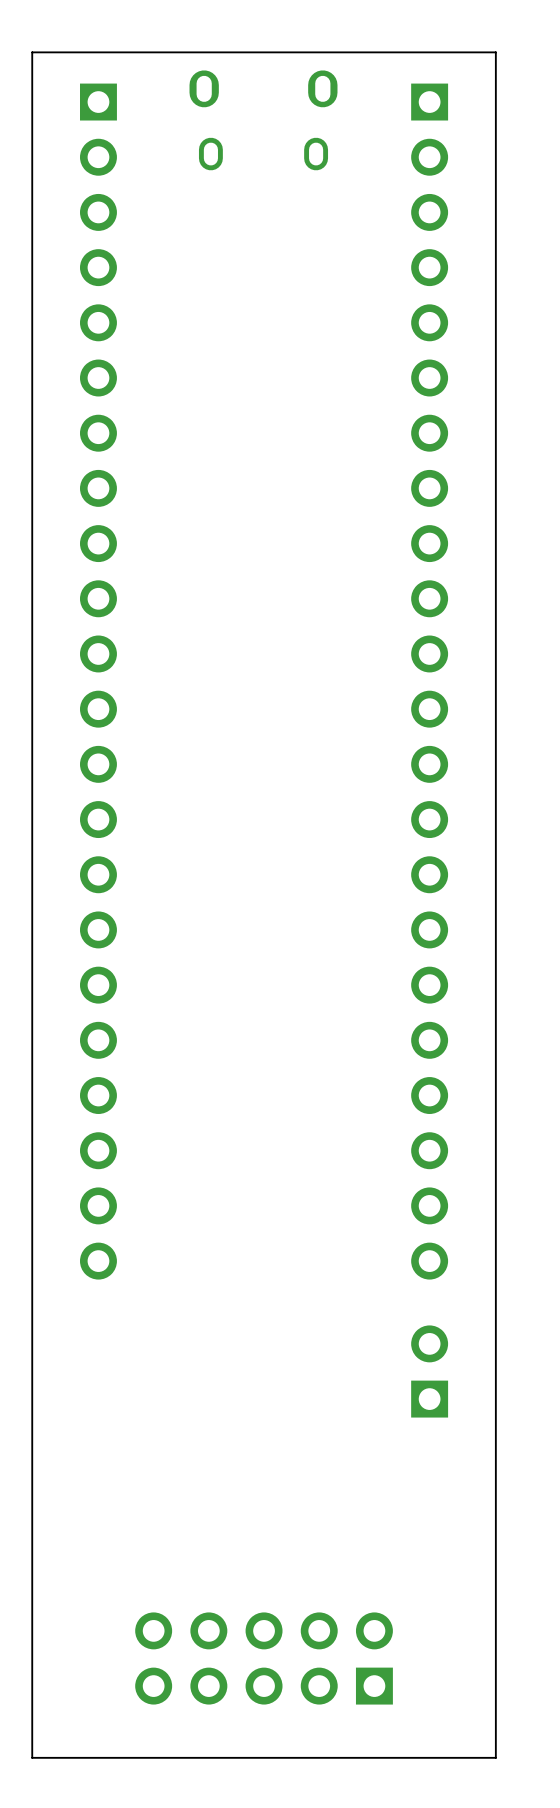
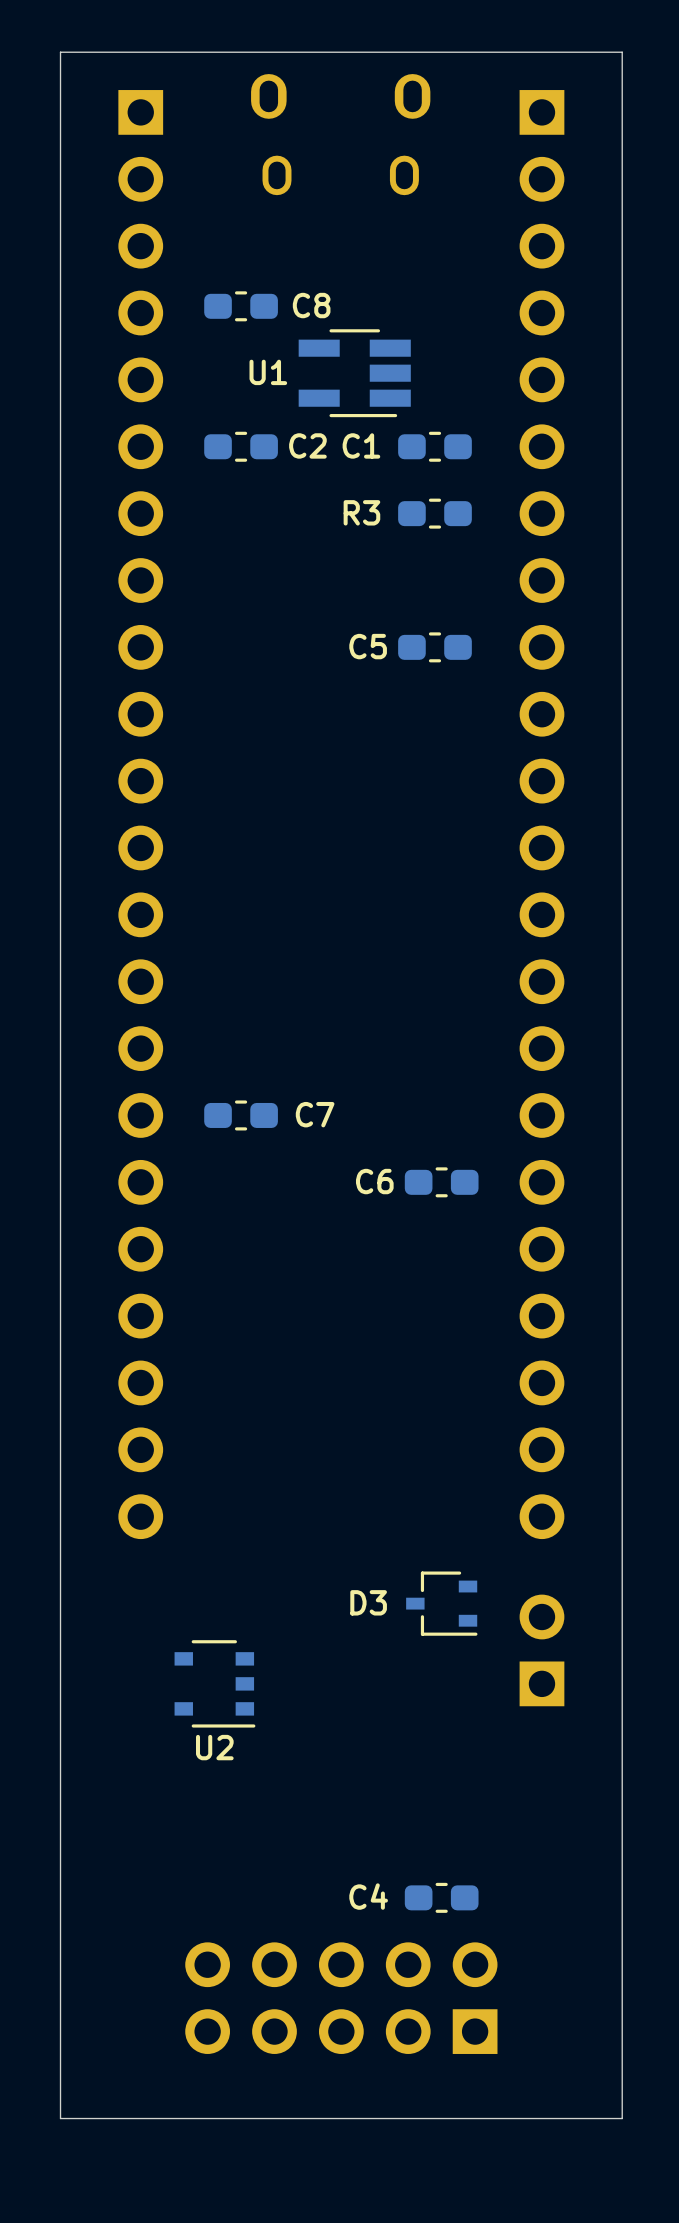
C8: none -> (241, 306)
U1: none -> (354, 373)
C2: none -> (241, 446)
C1: none -> (434, 446)
R3: none -> (434, 513)
C5: none -> (434, 647)
C7: none -> (241, 1115)
C6: none -> (441, 1182)
D3: none -> (441, 1603)
U2: none -> (214, 1683)
C4: none -> (441, 1897)

